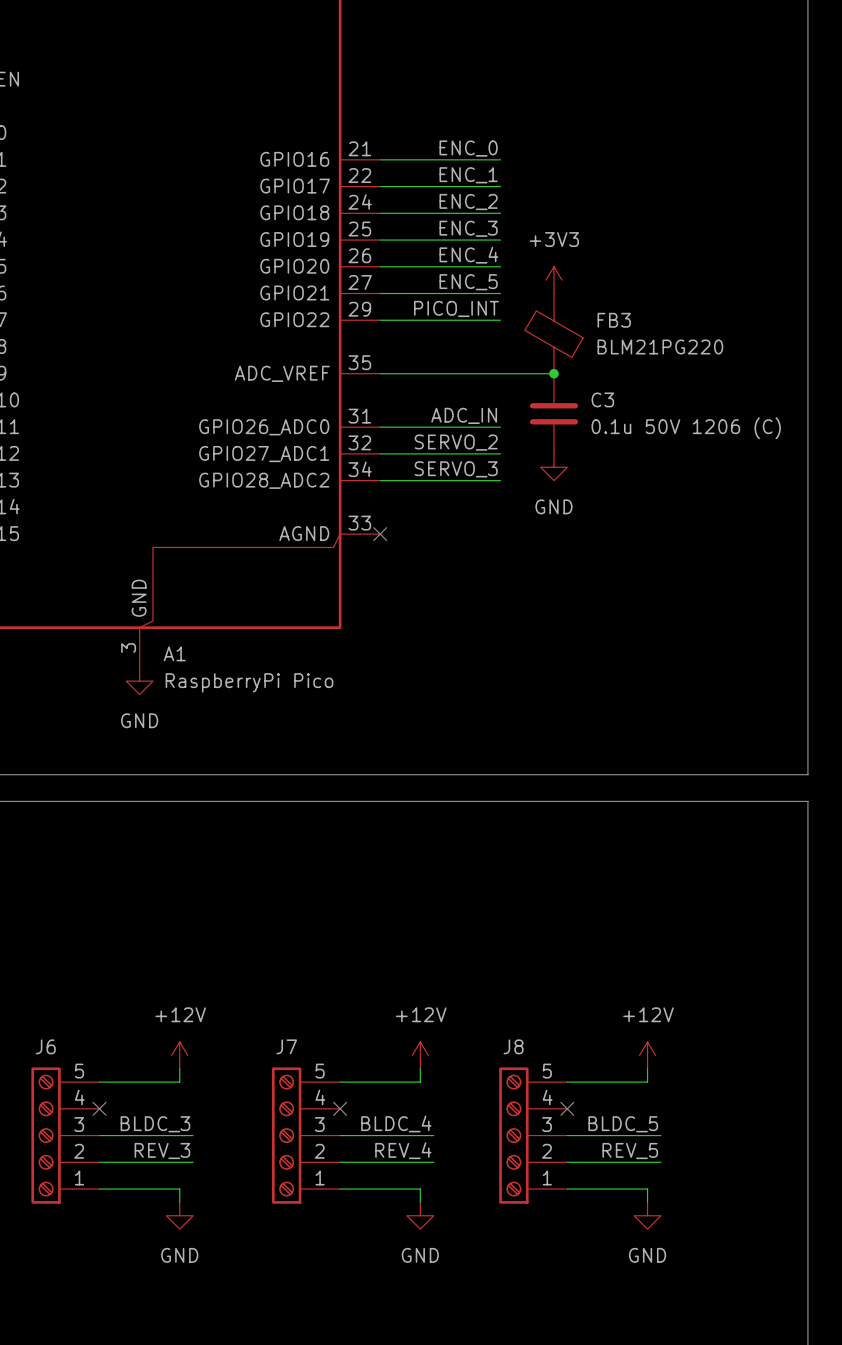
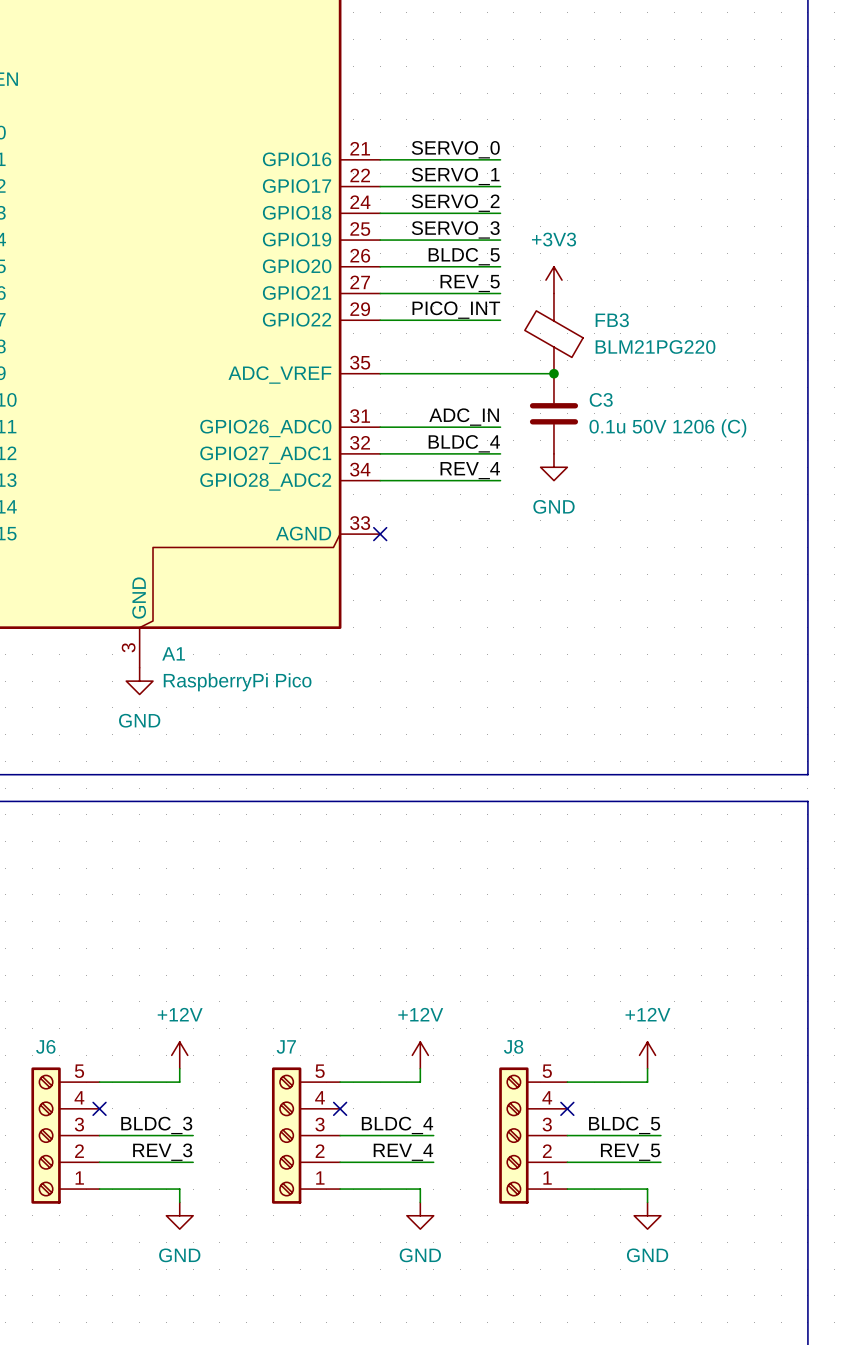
label: ENC_0 (468, 148) -> SERVO_0 (455, 149)
label: ENC_1 (468, 175) -> SERVO_1 (455, 176)
label: ENC_2 (468, 202) -> SERVO_2 (455, 203)
label: ENC_3 (468, 228) -> SERVO_3 (455, 229)
label: ENC_4 (468, 255) -> BLDC_5 (464, 256)
label: ENC_5 (468, 282) -> REV_5 (470, 283)
label: SERVO_2 (456, 442) -> BLDC_4 (464, 443)
label: SERVO_3 (456, 469) -> REV_4 (470, 470)

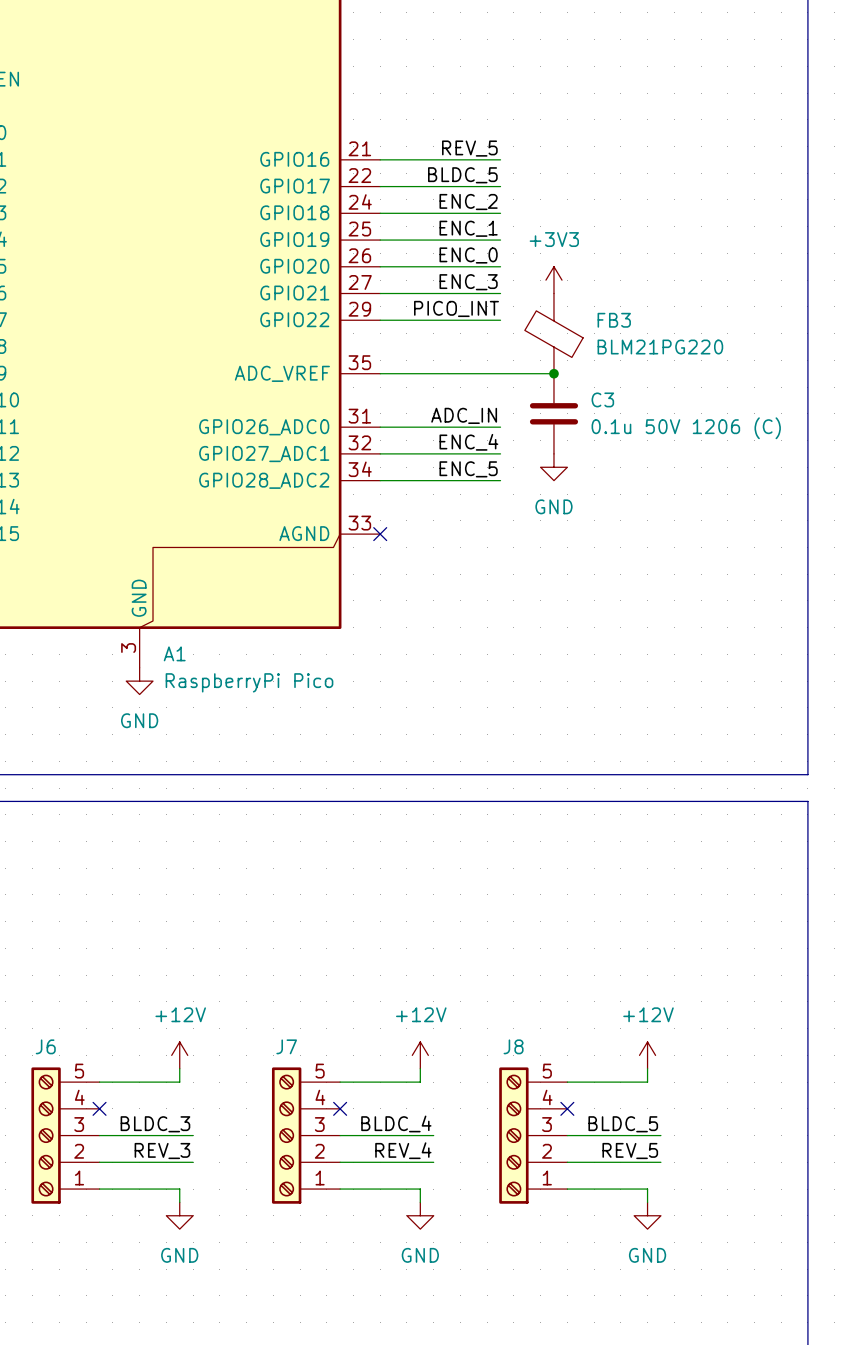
label: SERVO_0 (455, 149) -> REV_5 (469, 148)
label: SERVO_1 (455, 176) -> BLDC_5 (462, 175)
label: SERVO_2 (455, 203) -> ENC_2 (468, 202)
label: SERVO_3 (455, 229) -> ENC_1 (468, 228)
label: BLDC_5 (464, 256) -> ENC_0 (468, 255)
label: REV_5 (470, 283) -> ENC_3 (468, 282)
label: BLDC_4 (464, 443) -> ENC_4 (468, 442)
label: REV_4 (470, 470) -> ENC_5 (468, 469)

